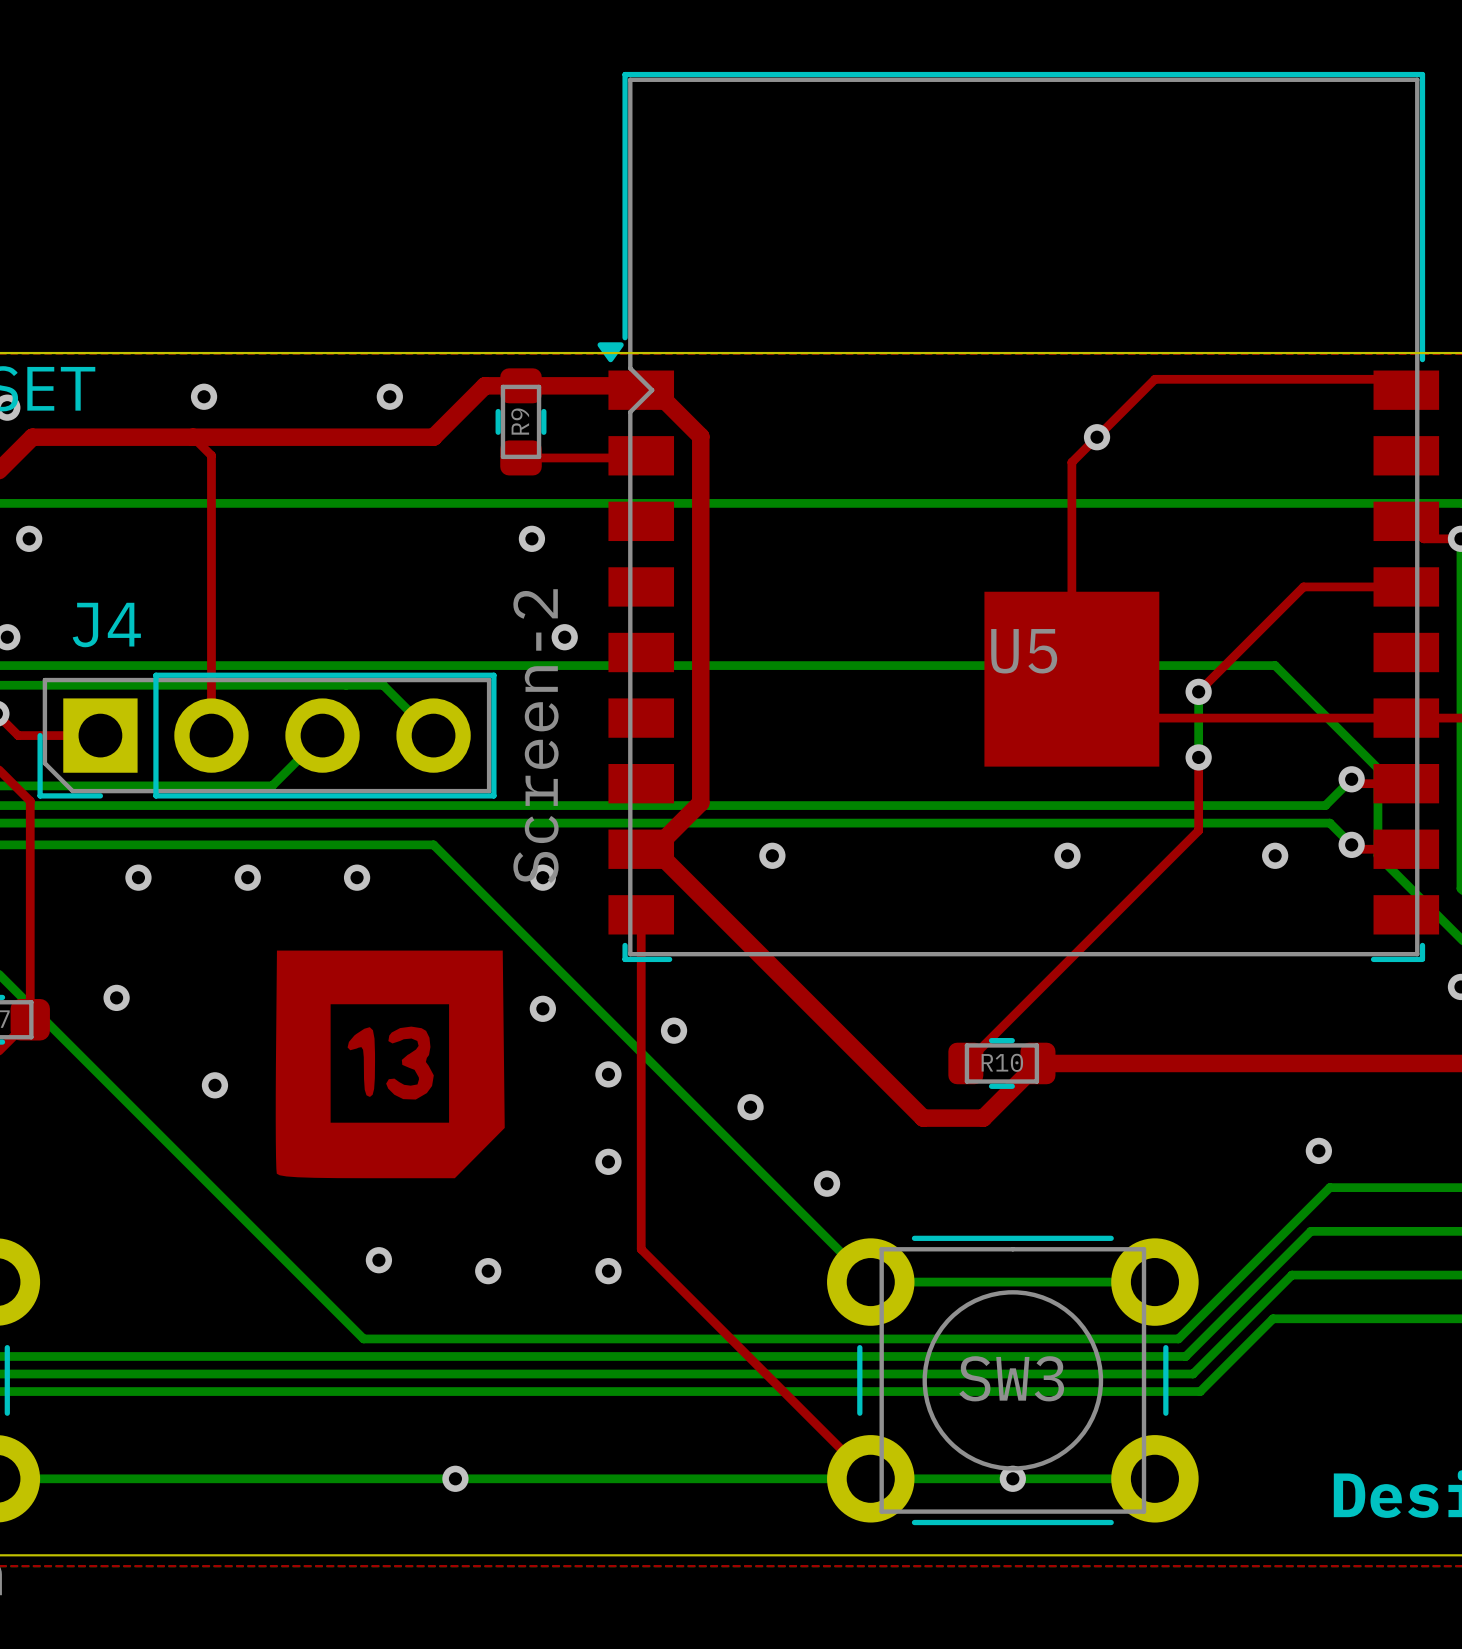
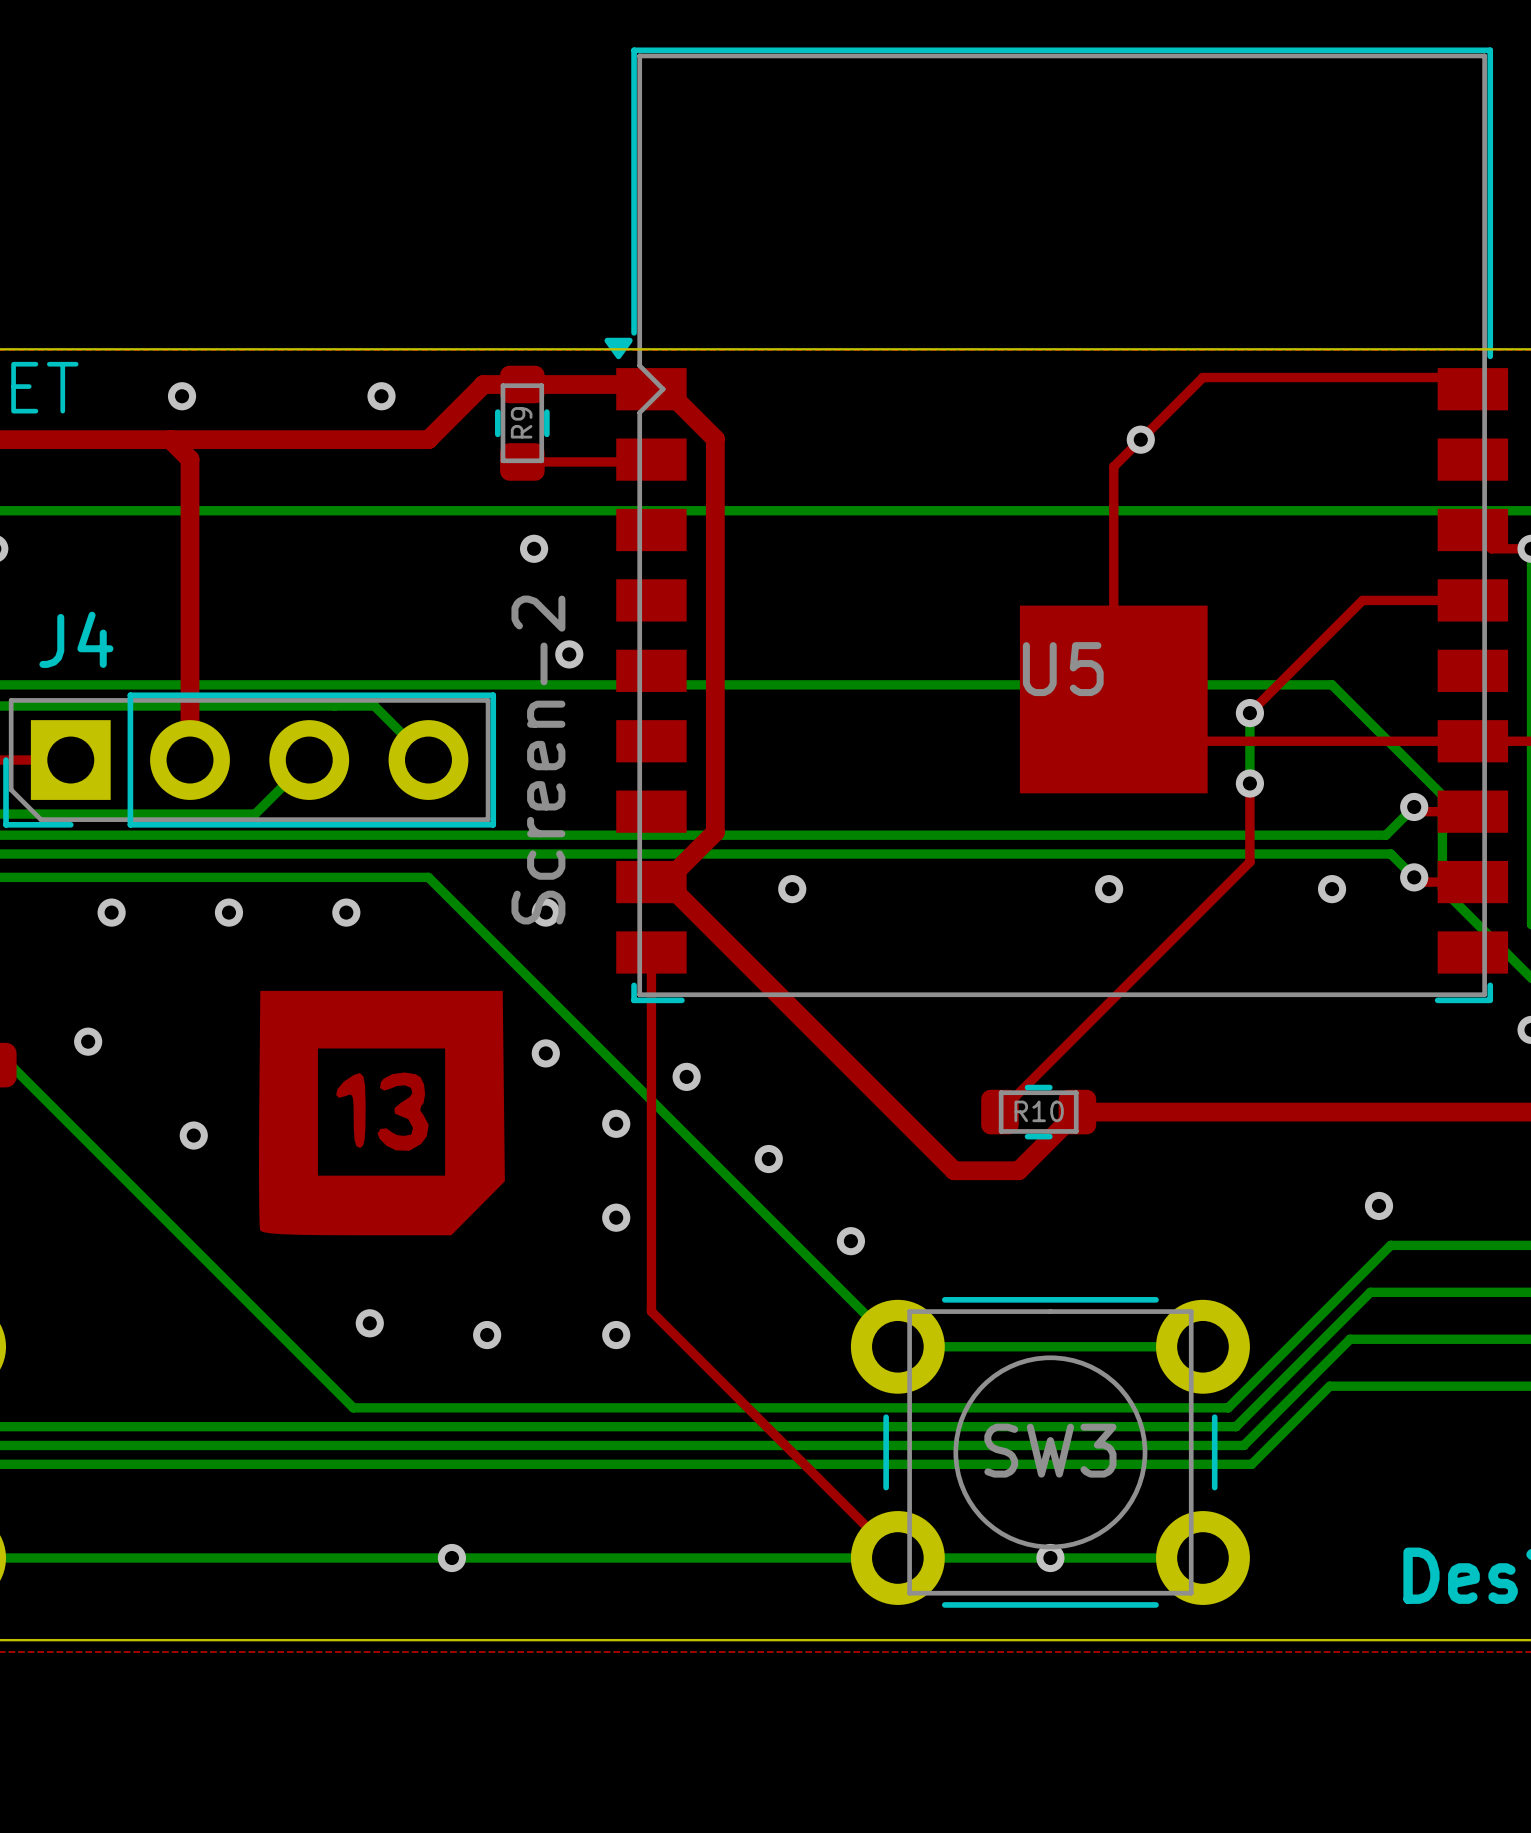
top track width: thin (193, 437) (211, 455) (211, 735) -> thick (170, 439) (190, 459) (190, 760)

